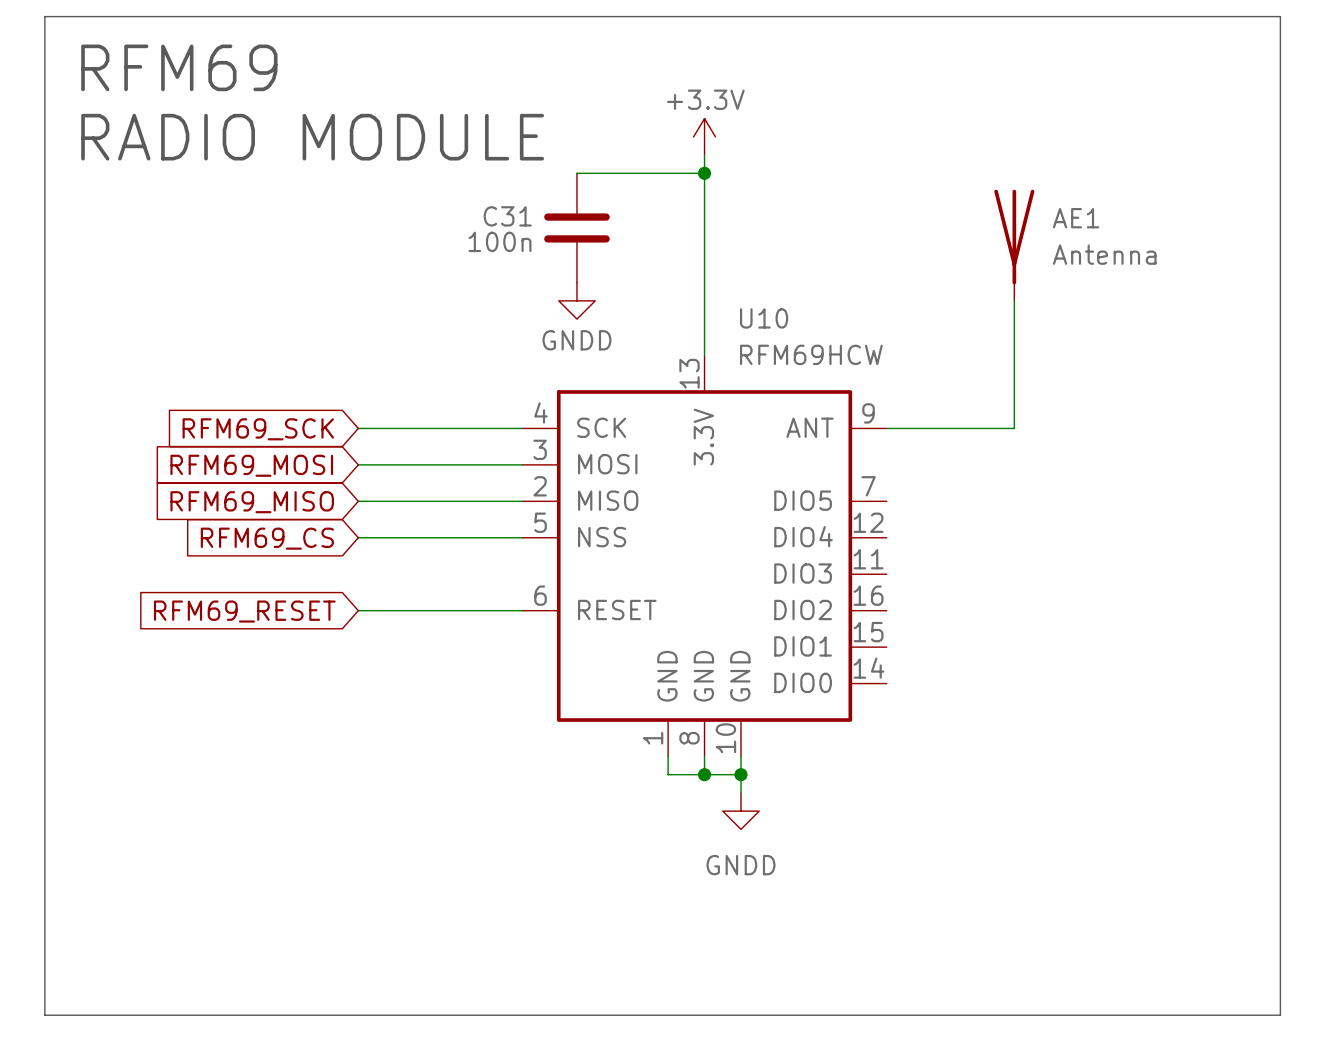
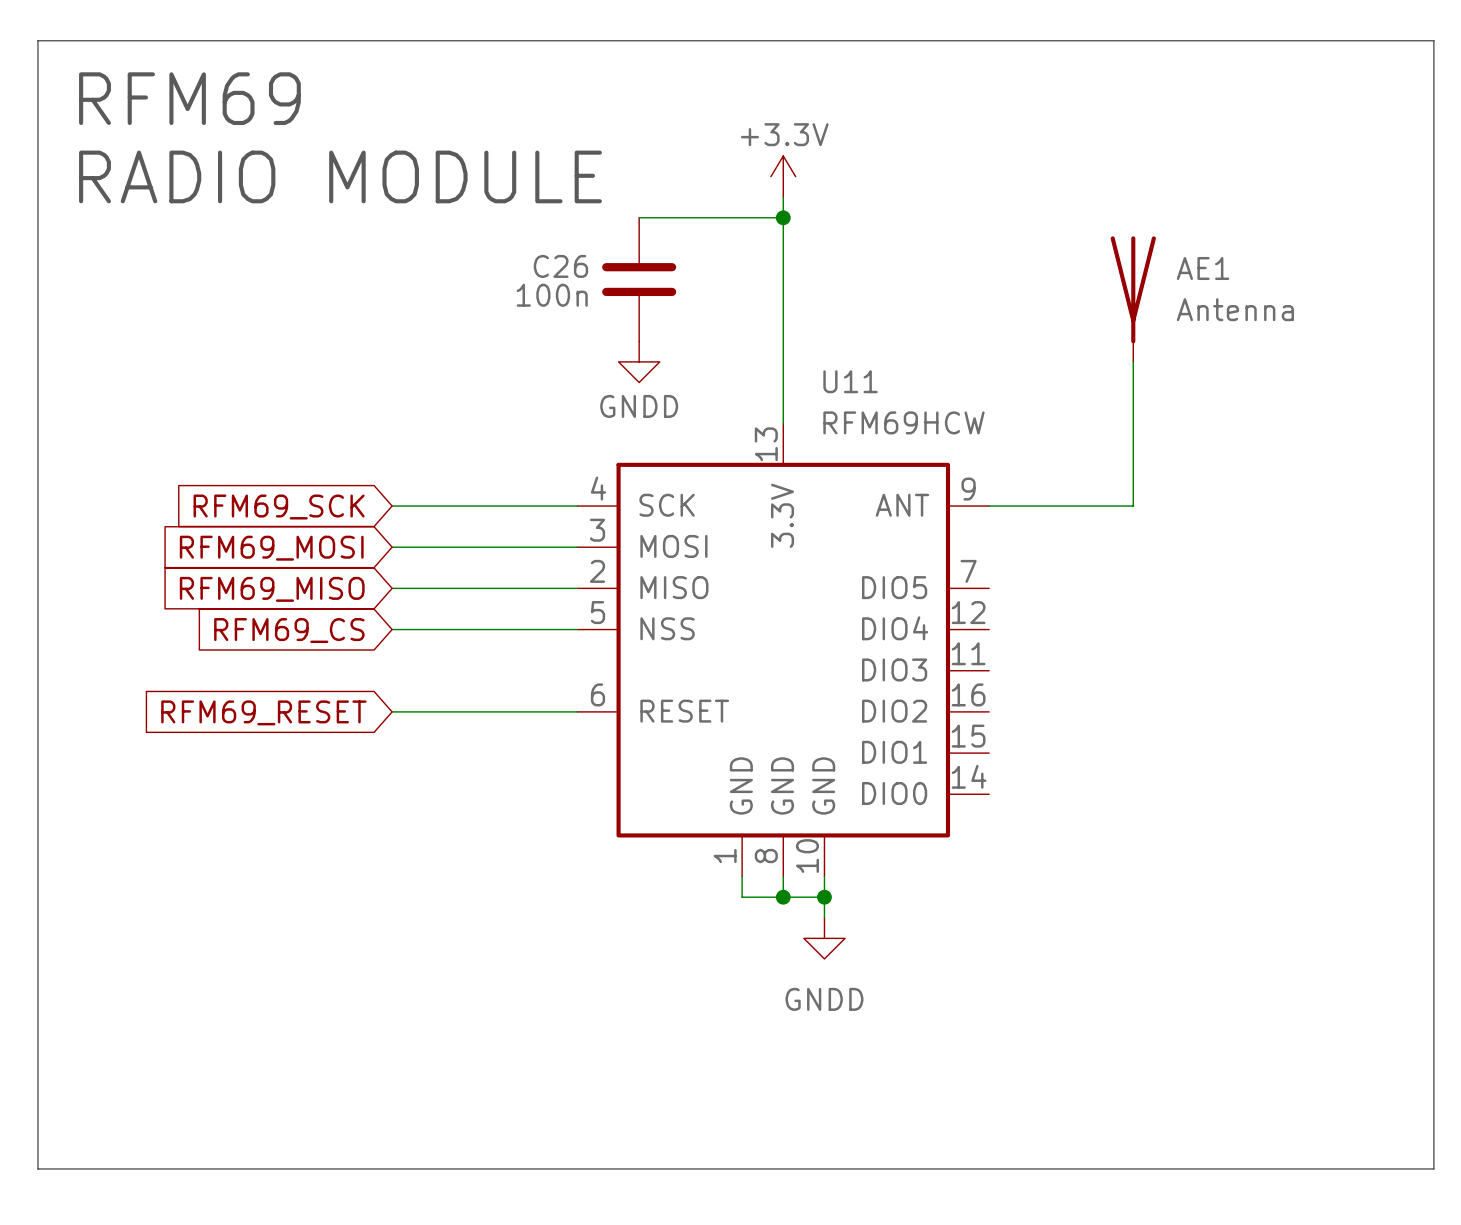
C31 name: C31 (507, 216) -> C26 (560, 266)
U10 name: U10 (764, 318) -> U11 (850, 381)

